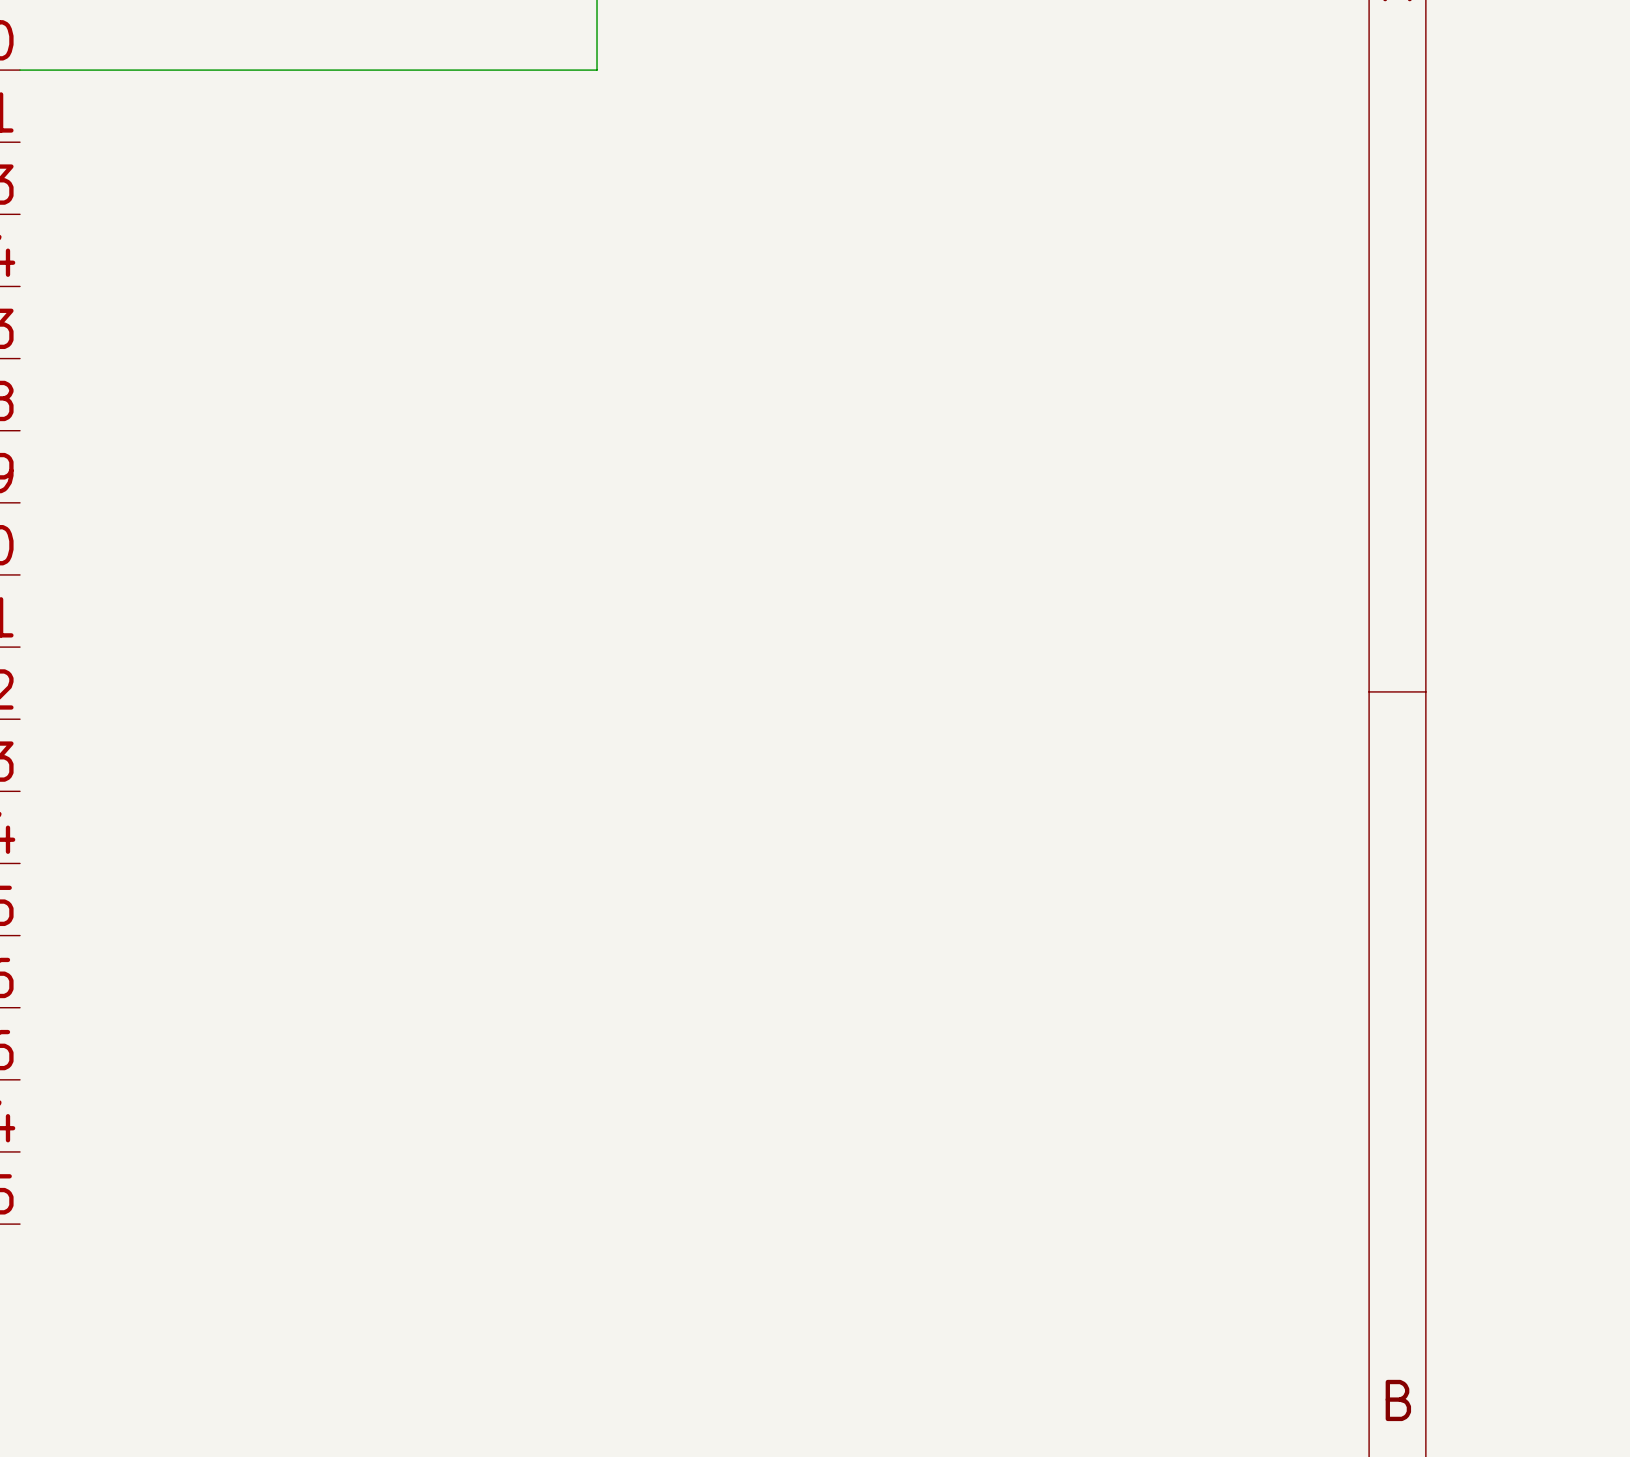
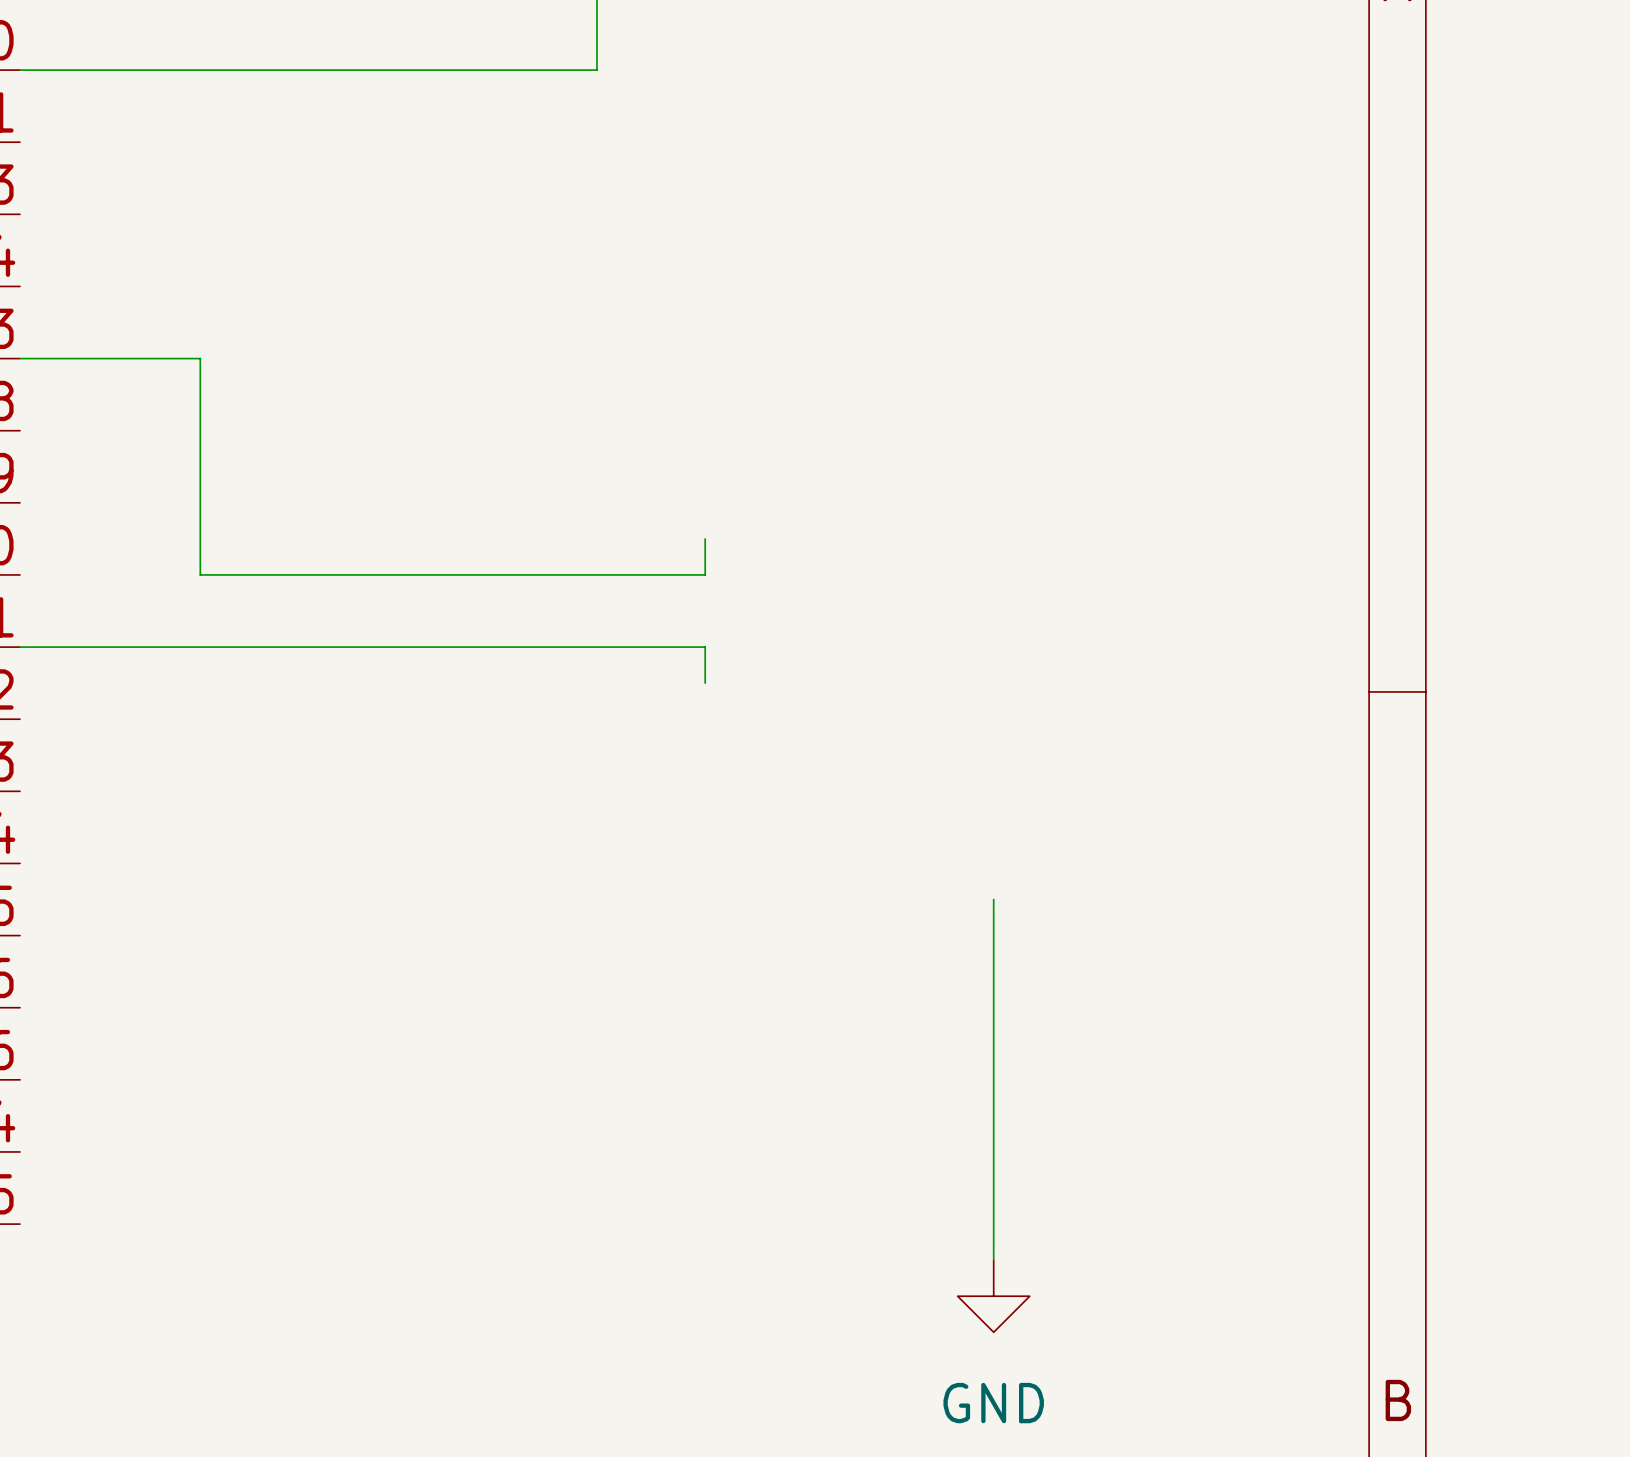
wire: none -> (20, 358) (200, 358) (200, 574) (705, 574) (705, 538)
wire: none -> (20, 647) (705, 647) (705, 683)
wire: none -> (993, 899) (993, 1260)
power symbol: none -> GND (993, 1296)

